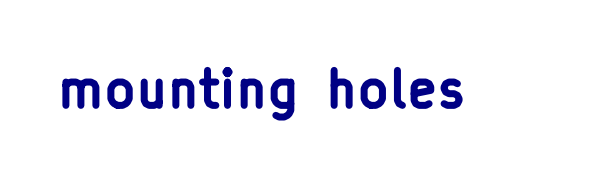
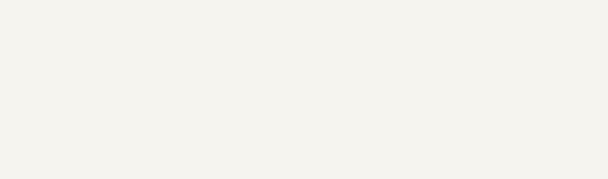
text: mounting holes (262, 93) -> none

